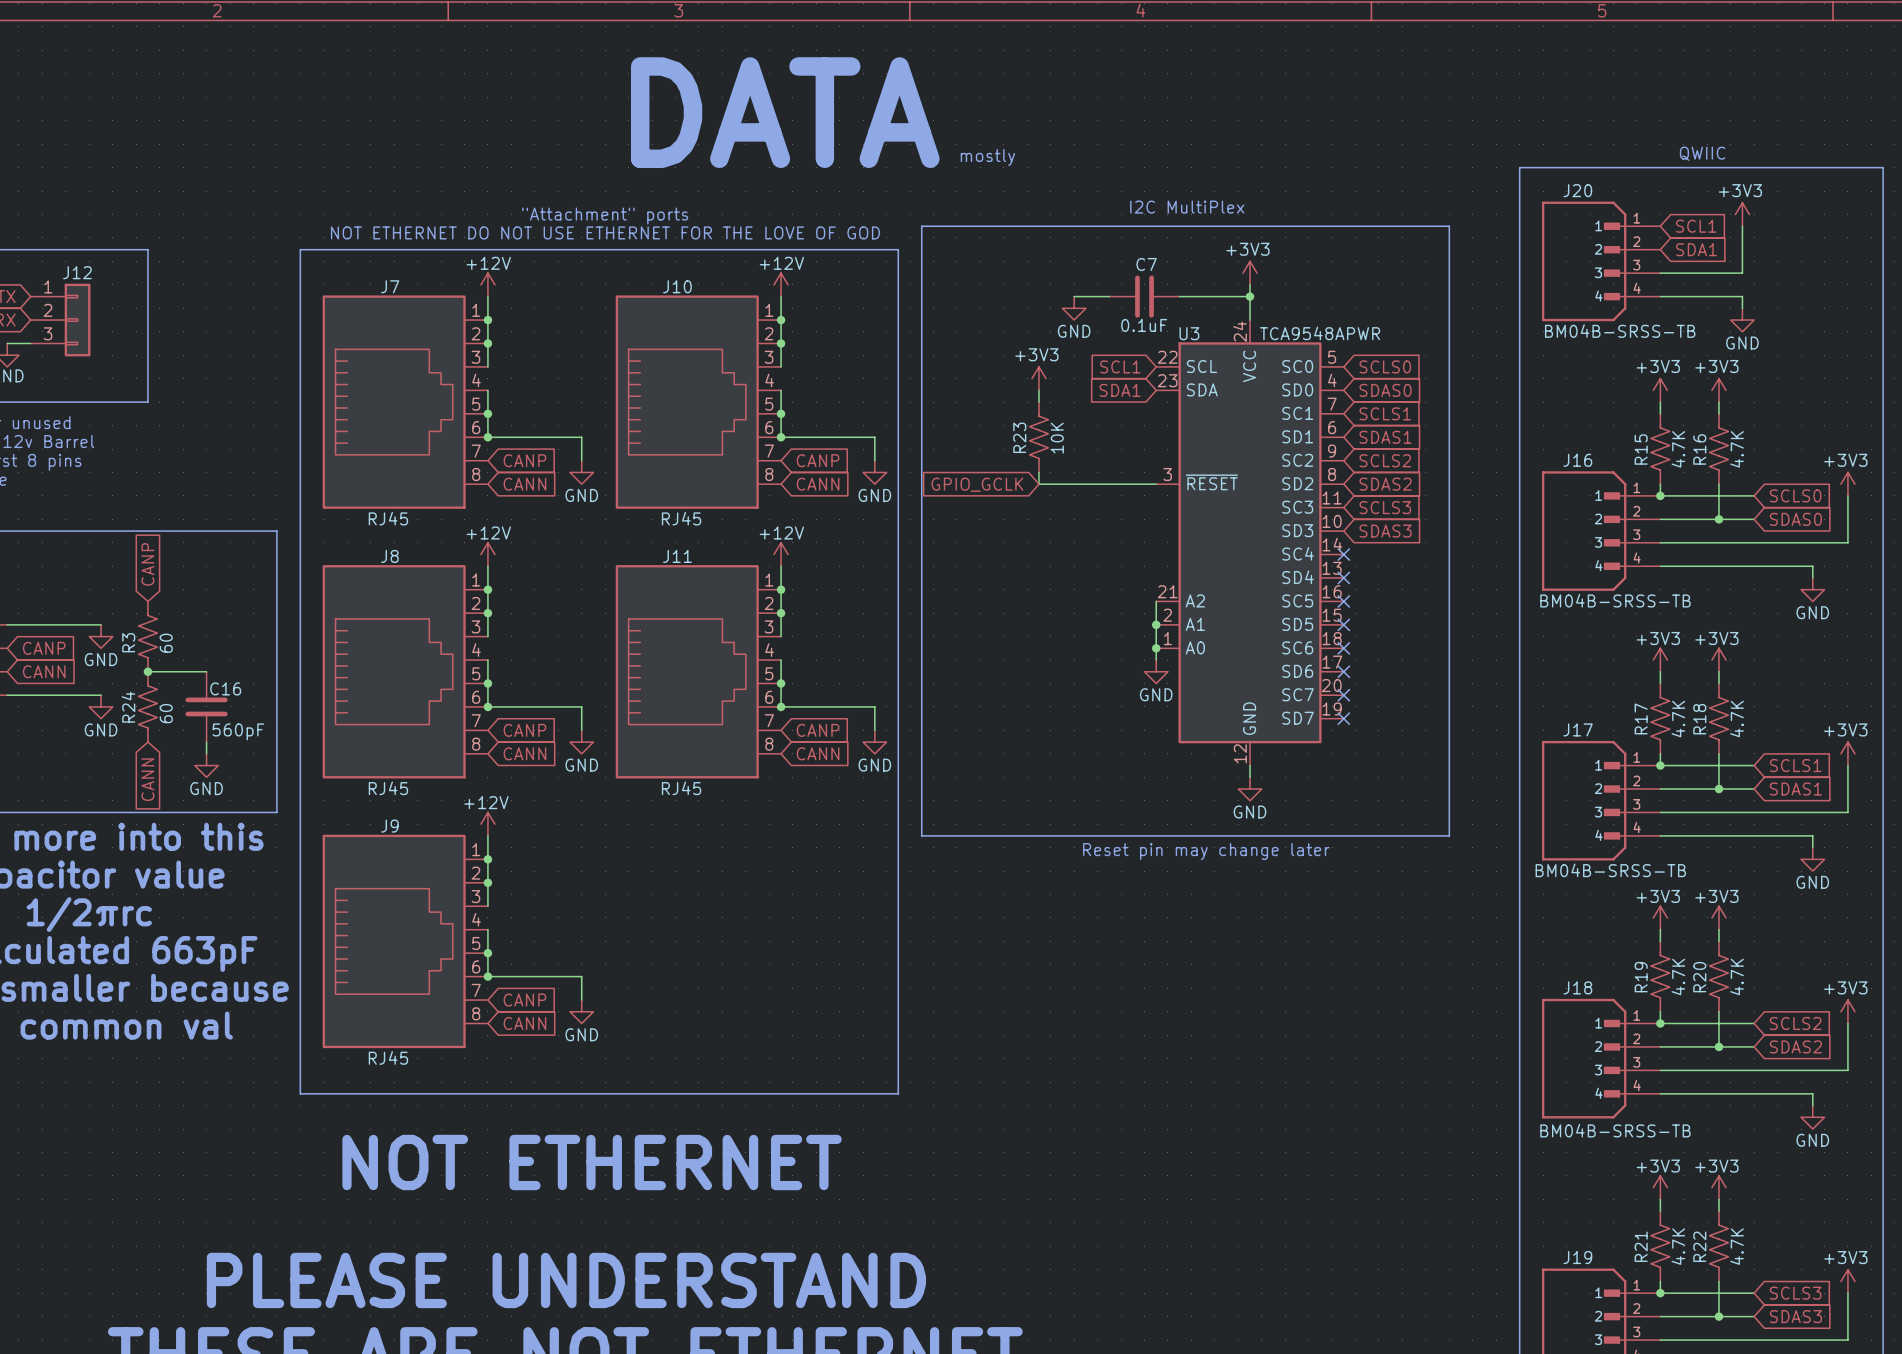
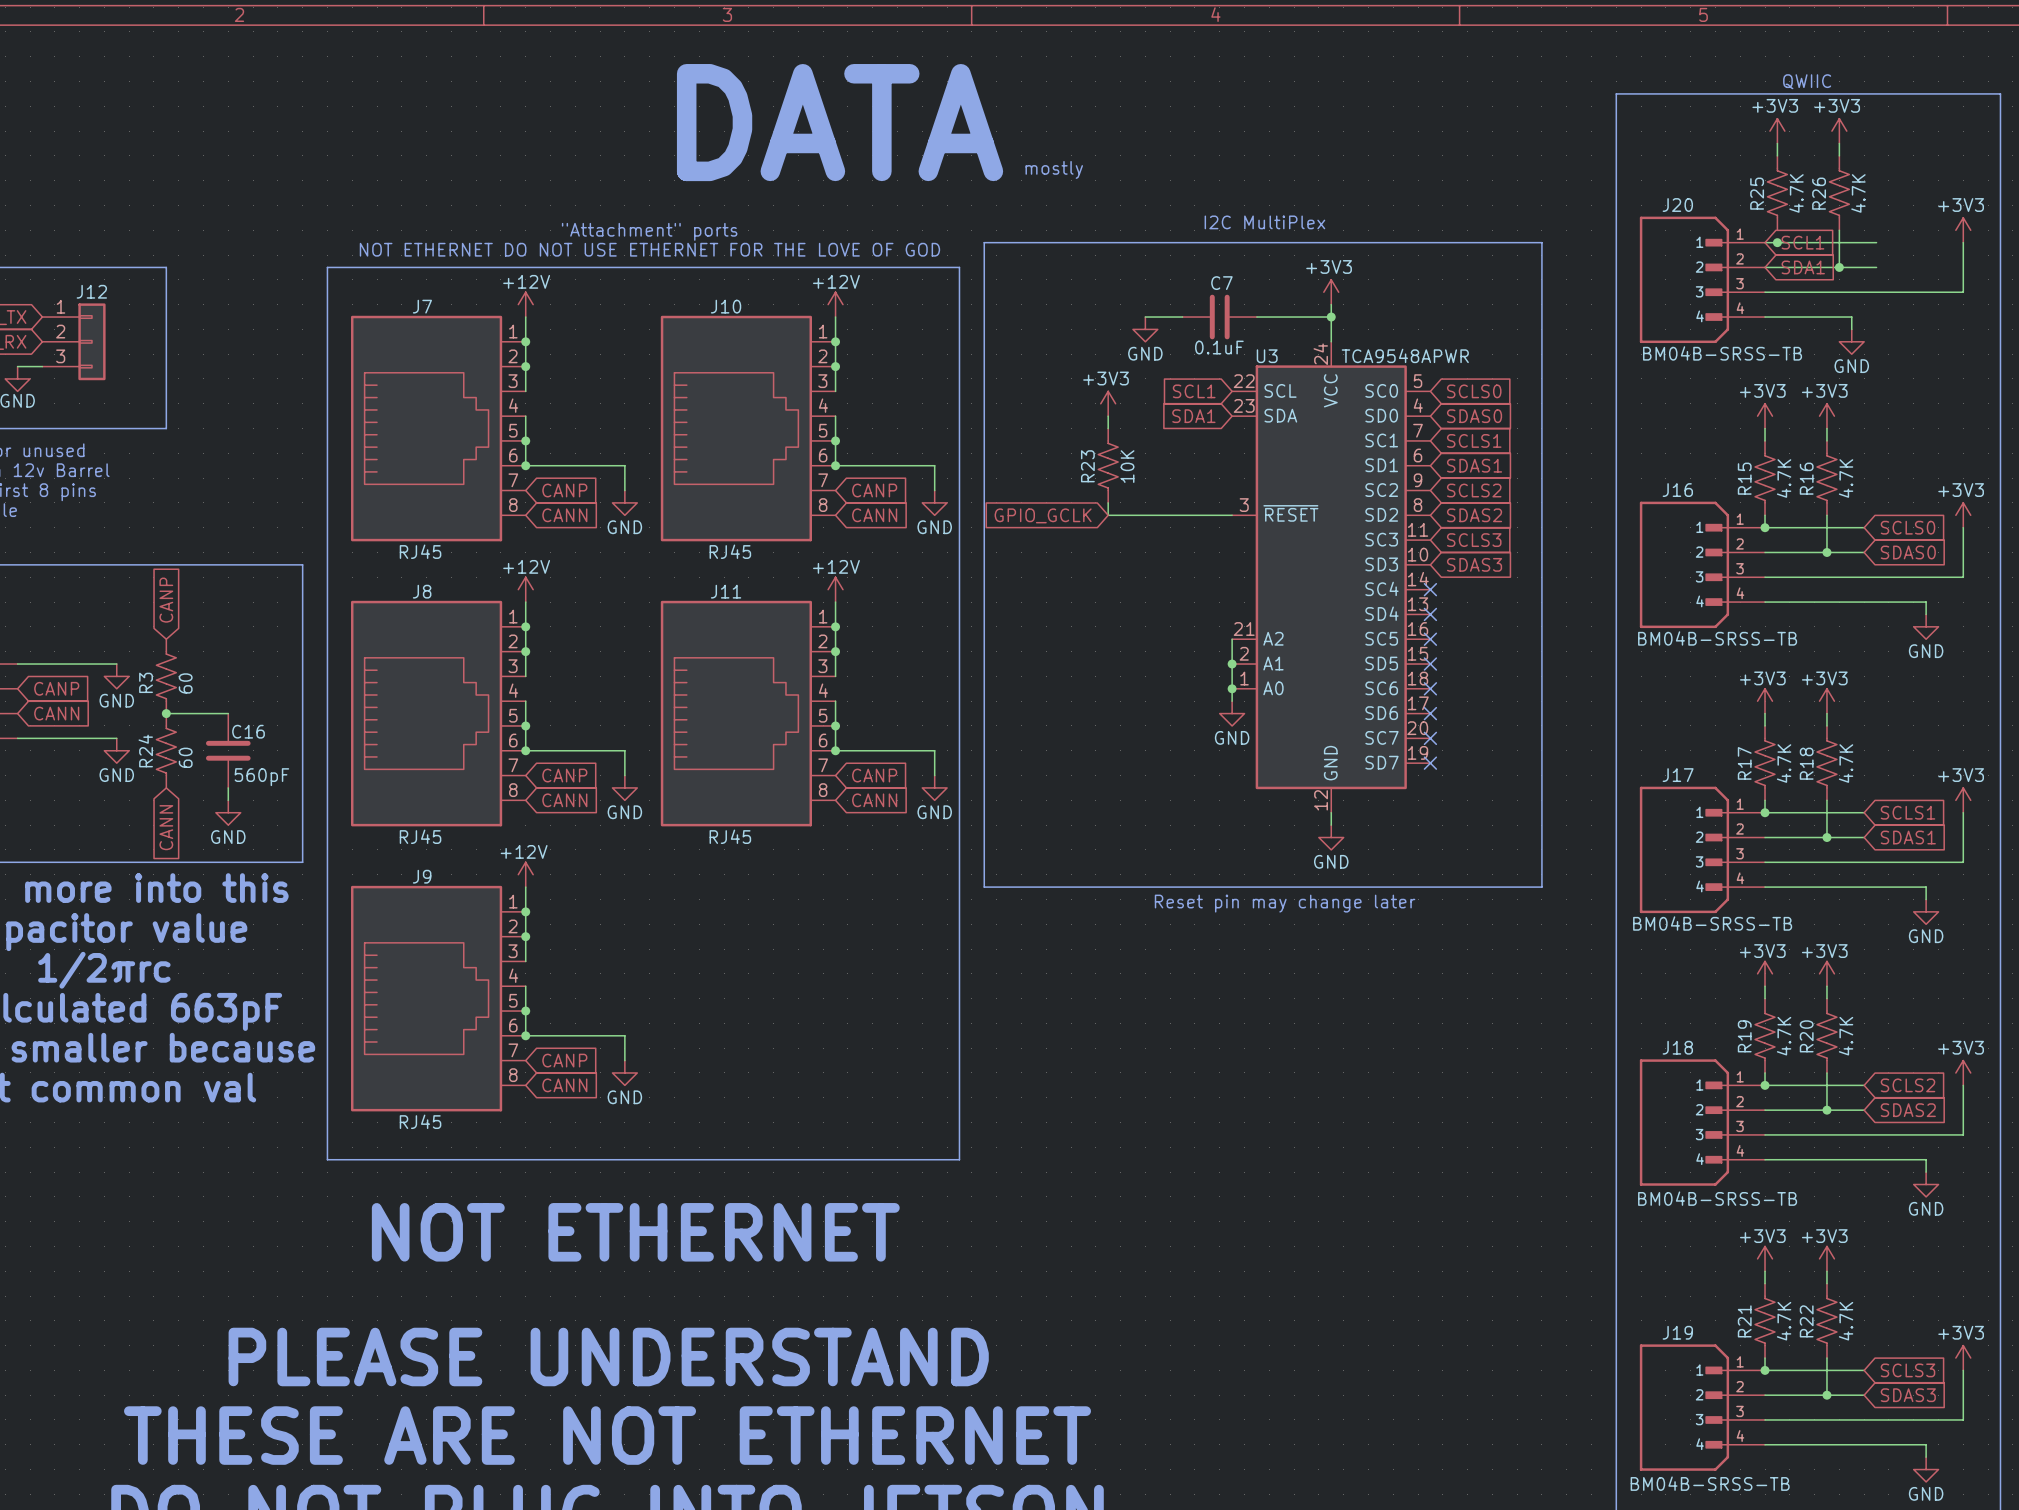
power symbol: none -> +3V3 (1777, 131)
power symbol: none -> +3V3 (1839, 131)
wire: none -> (1777, 143) (1777, 155)
wire: none -> (1839, 143) (1839, 155)
text position: QWIIC (1702, 153) -> QWIIC (1807, 81)
line: (1519, 167) (1883, 167) -> (1616, 180) (1616, 93) (2000, 93) (2000, 180)
R25: none -> 4.7K (1777, 193)
R26: none -> 4.7K (1839, 193)
wire: none -> (1839, 230) (1839, 267)
power symbol: +3V3 (1742, 214) -> none
power symbol: none -> +3V3 (1963, 230)
wire: none -> (1765, 242) (1876, 242)
junction: none -> (1777, 242)
wire: (1742, 226) (1742, 273) -> (1963, 242) (1963, 292) (1851, 292)
wire: none -> (1765, 267) (1876, 267)
junction: none -> (1839, 267)

